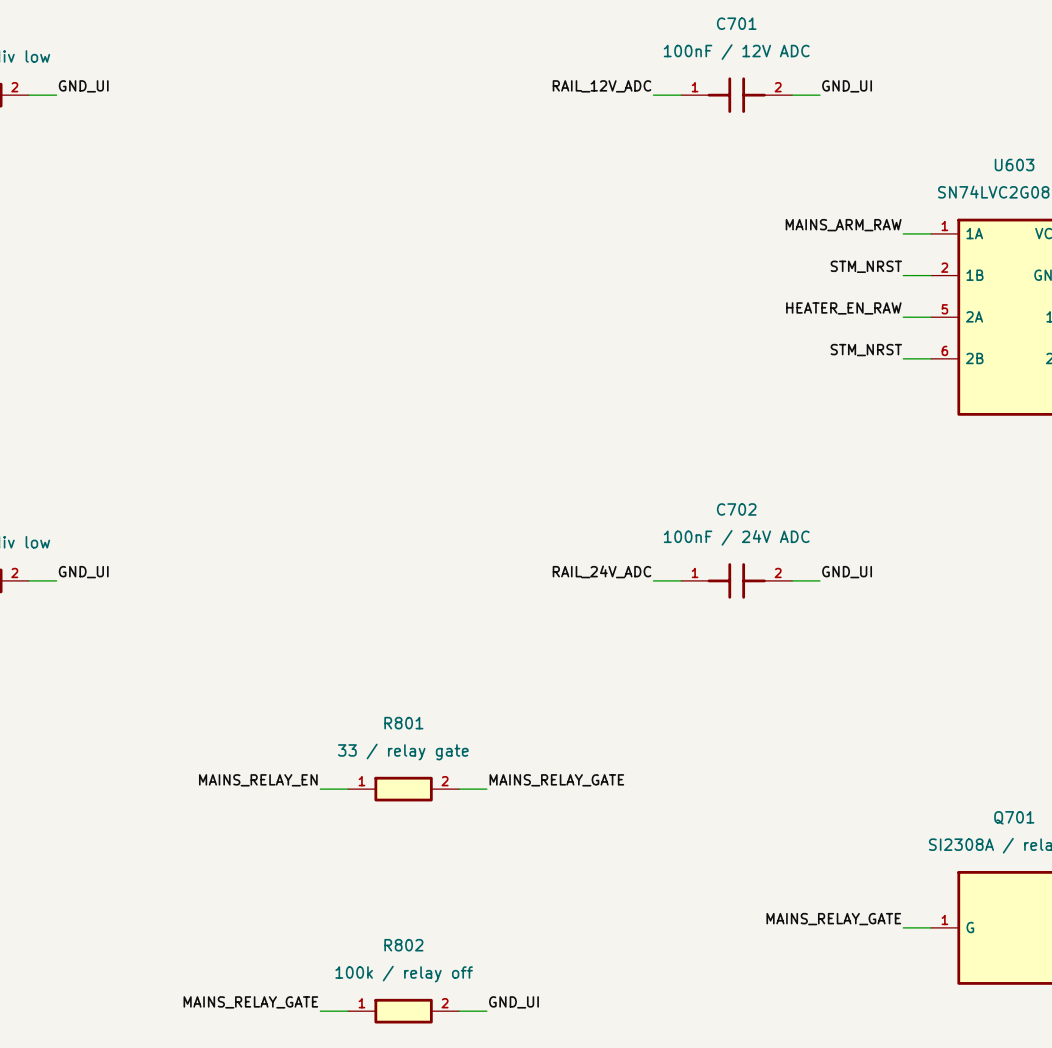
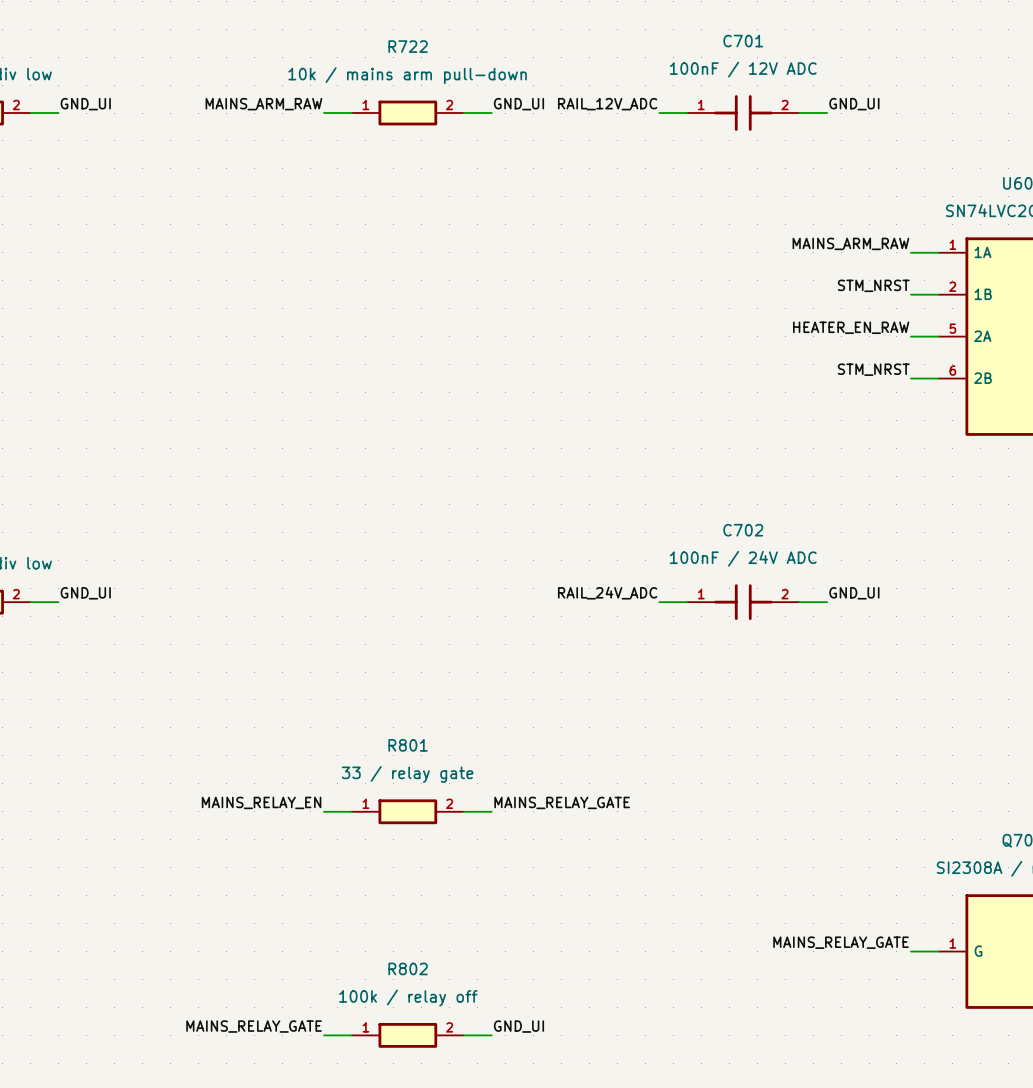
label: none -> MAINS_ARM_RAW (263, 104)
label: none -> GND_UI (518, 104)
wire: none -> (323, 113) (351, 113)
R722: none -> 10k / mains arm pull-down (407, 113)
wire: none -> (463, 113) (491, 113)

